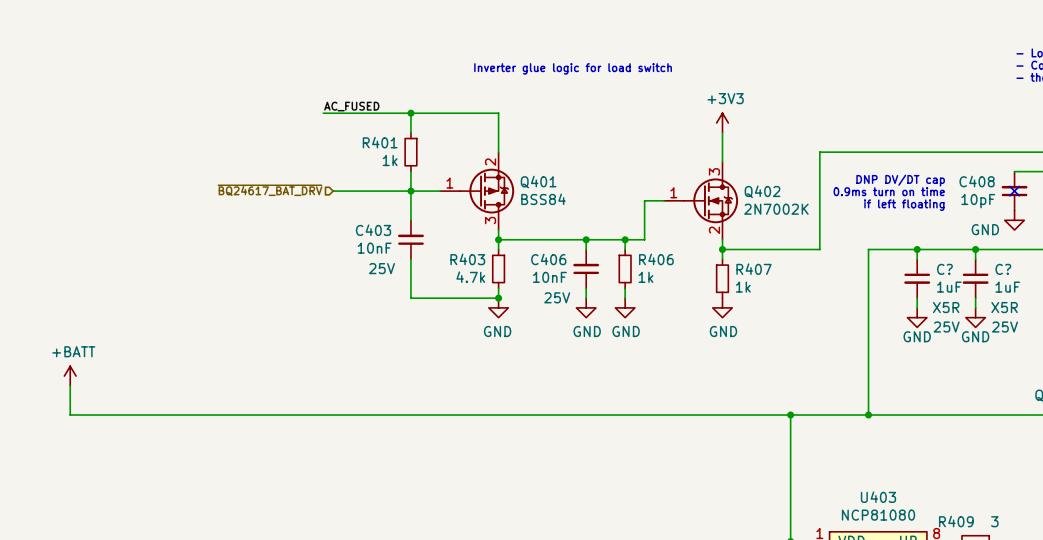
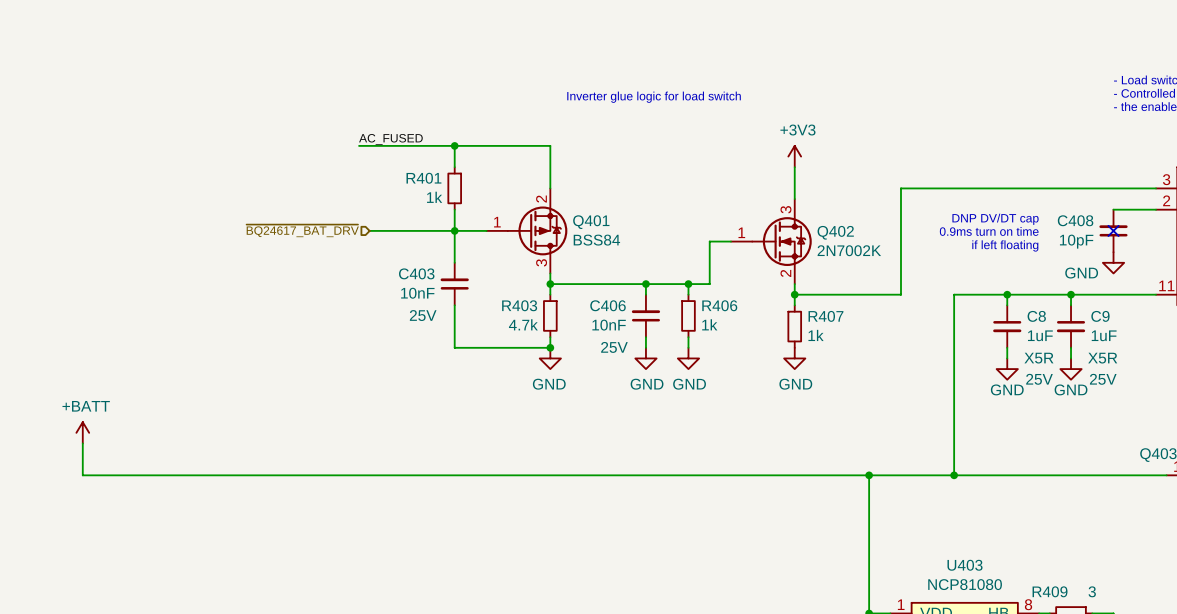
C? name: C? (944, 269) -> C8 (1036, 316)
C? name: C? (1003, 269) -> C9 (1100, 316)

